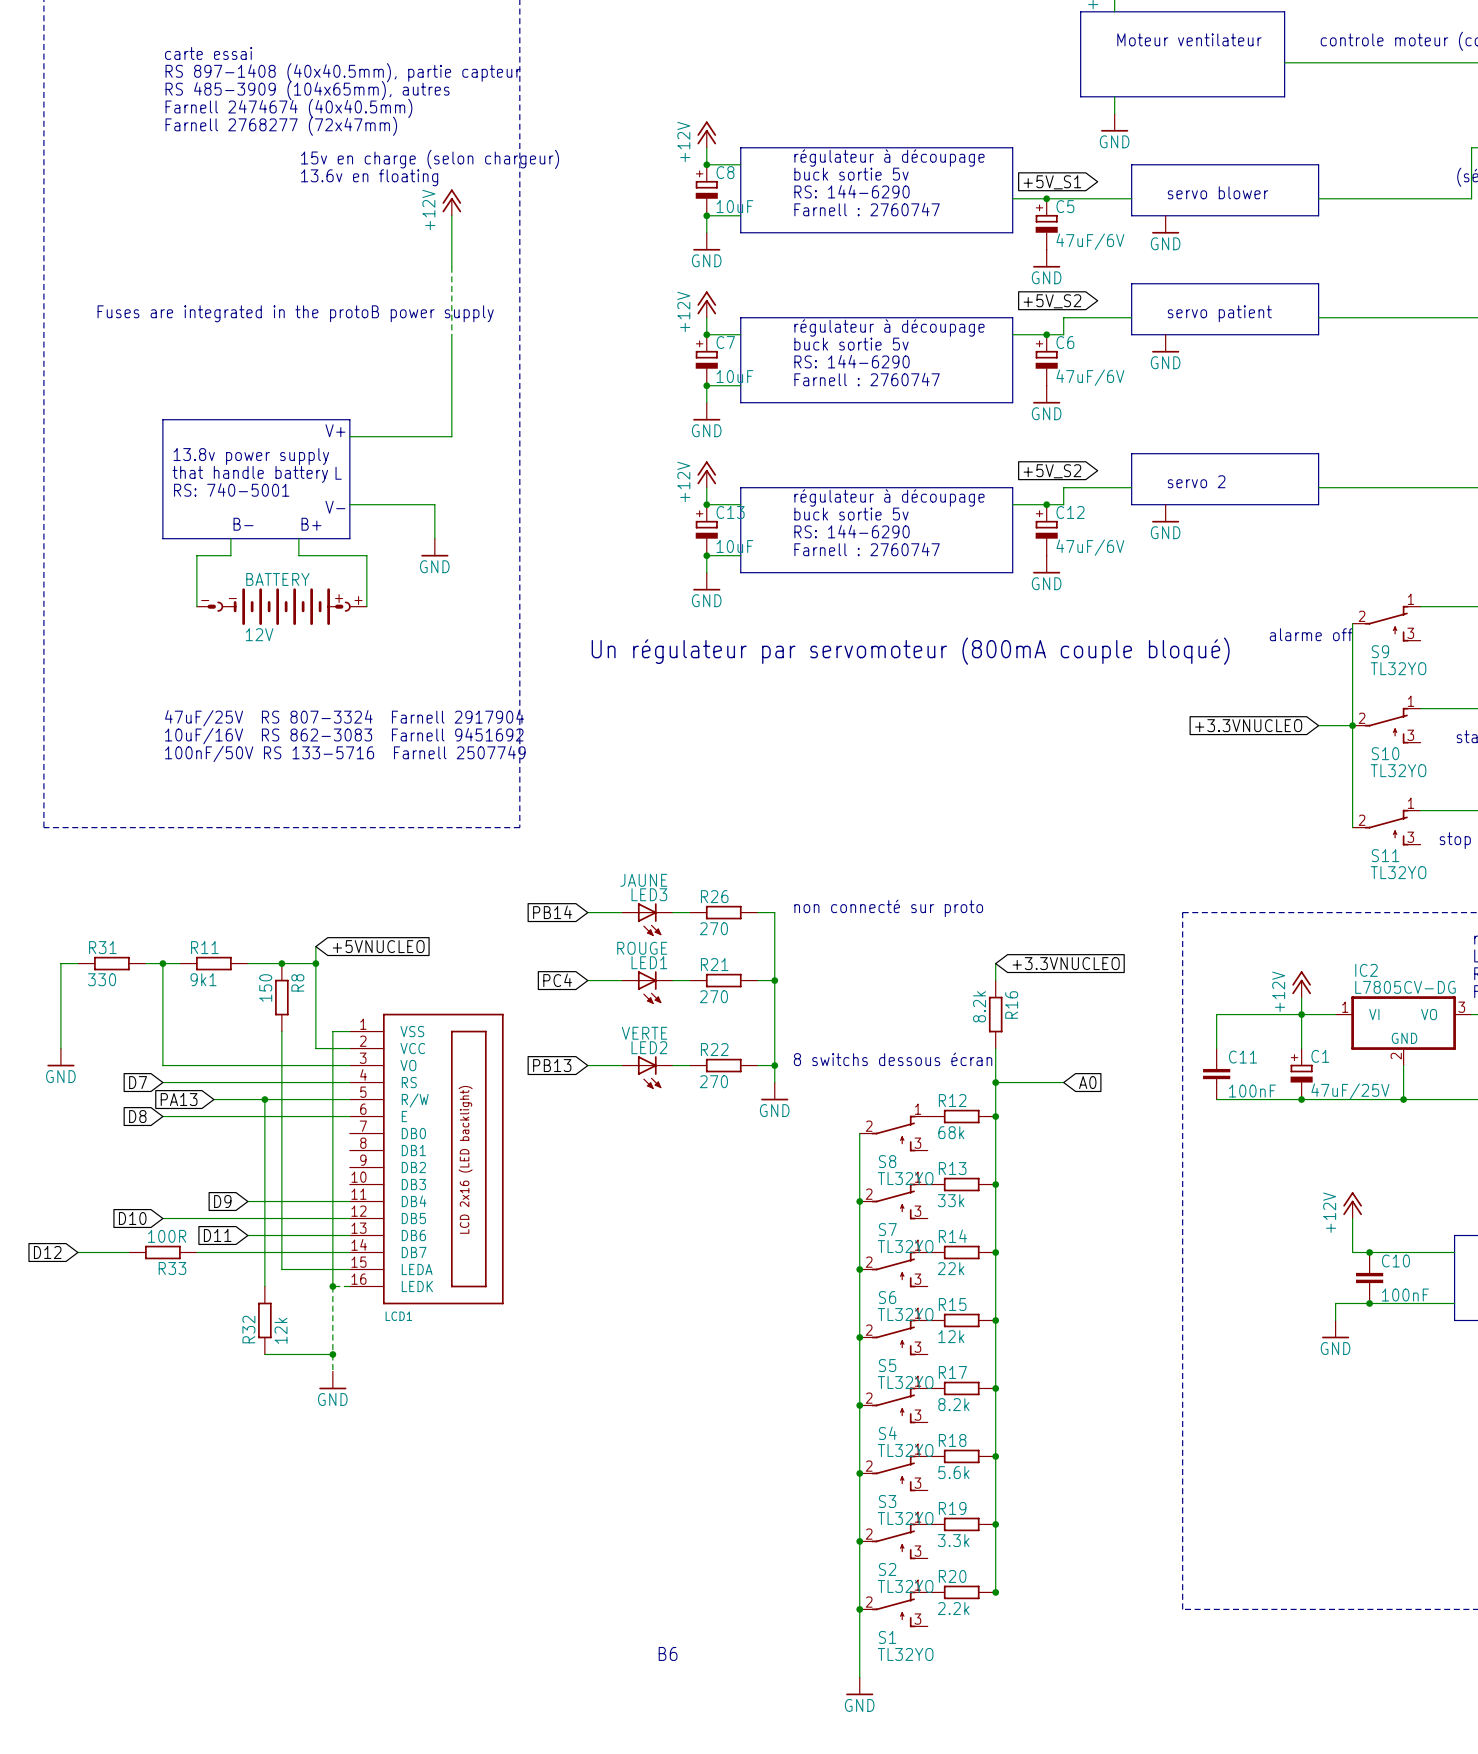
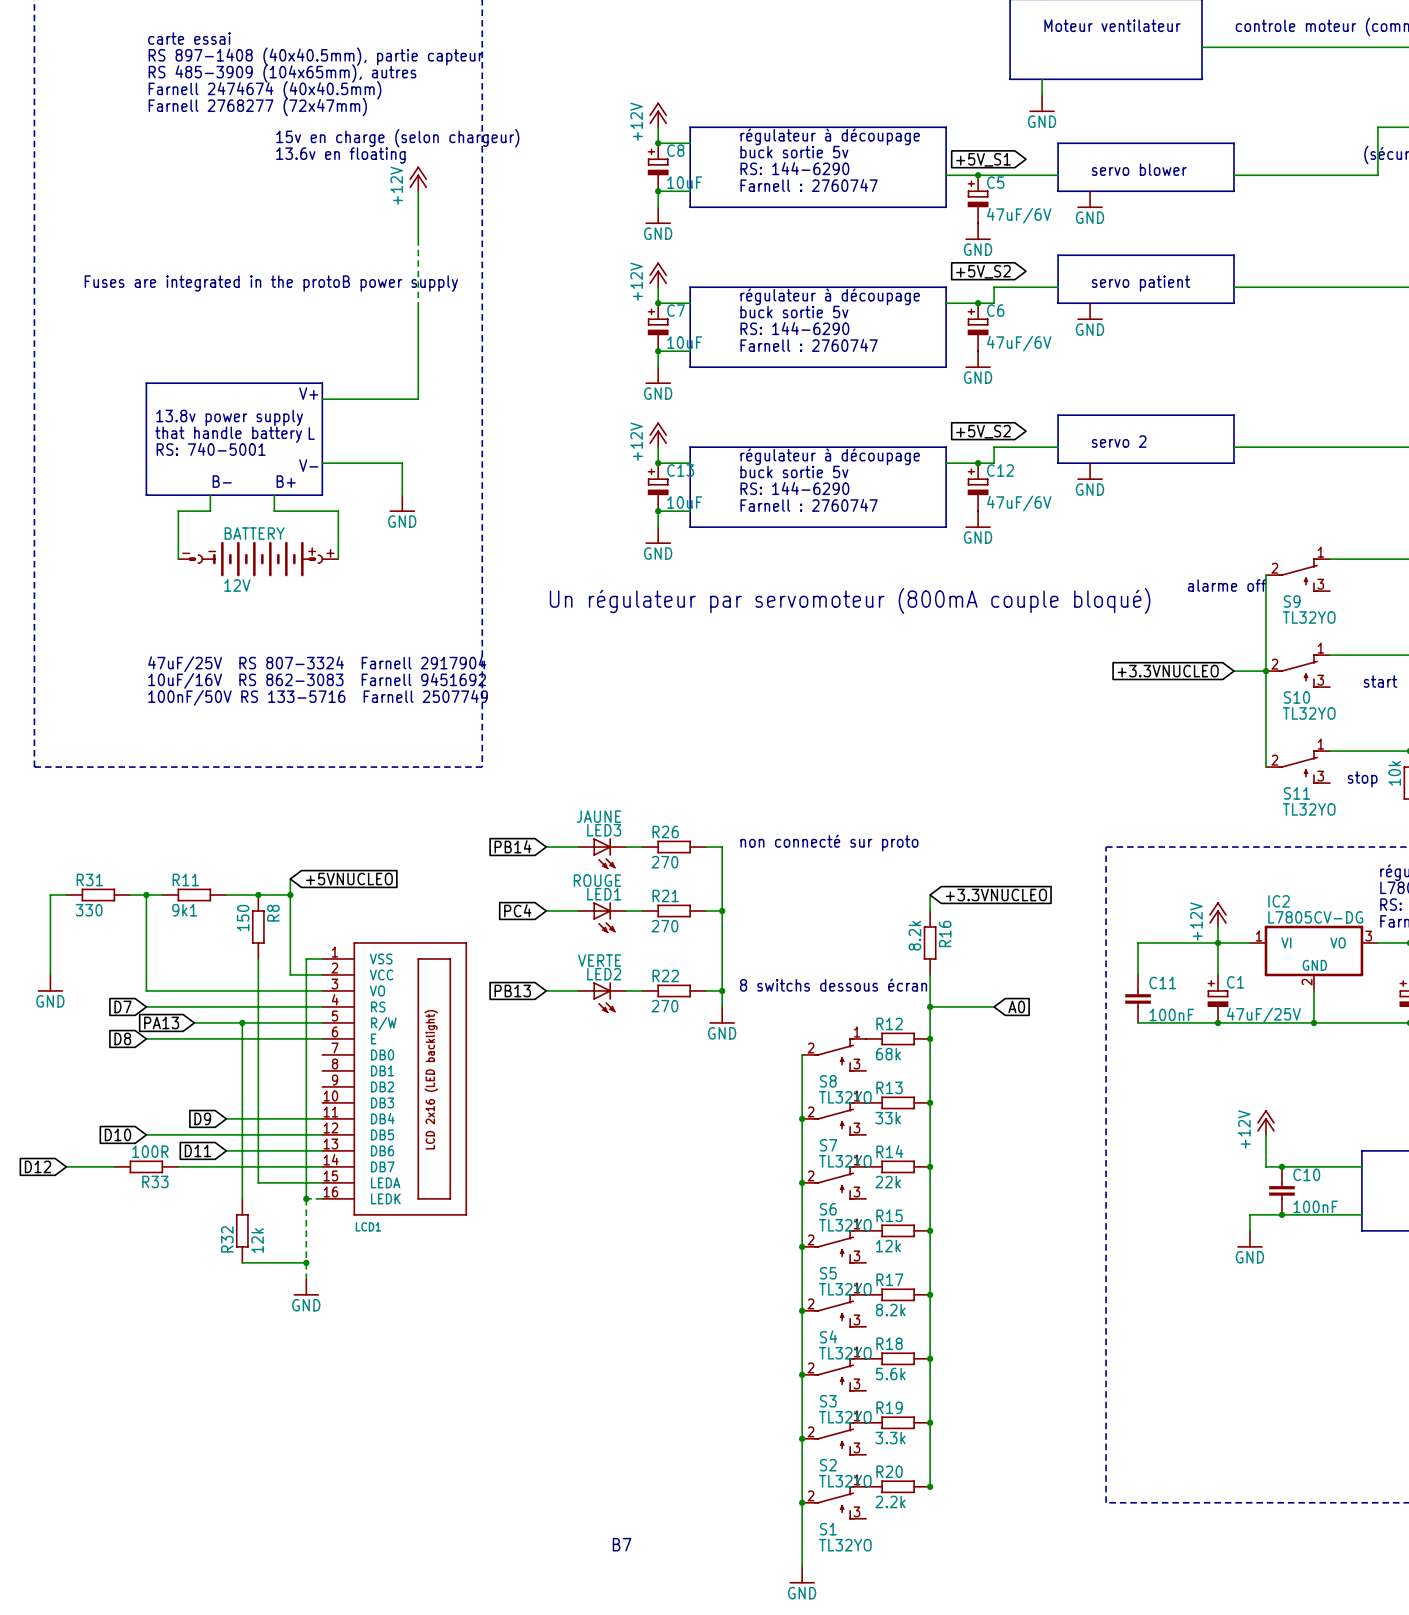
text: B6 (668, 1653) -> B7 (622, 1544)

